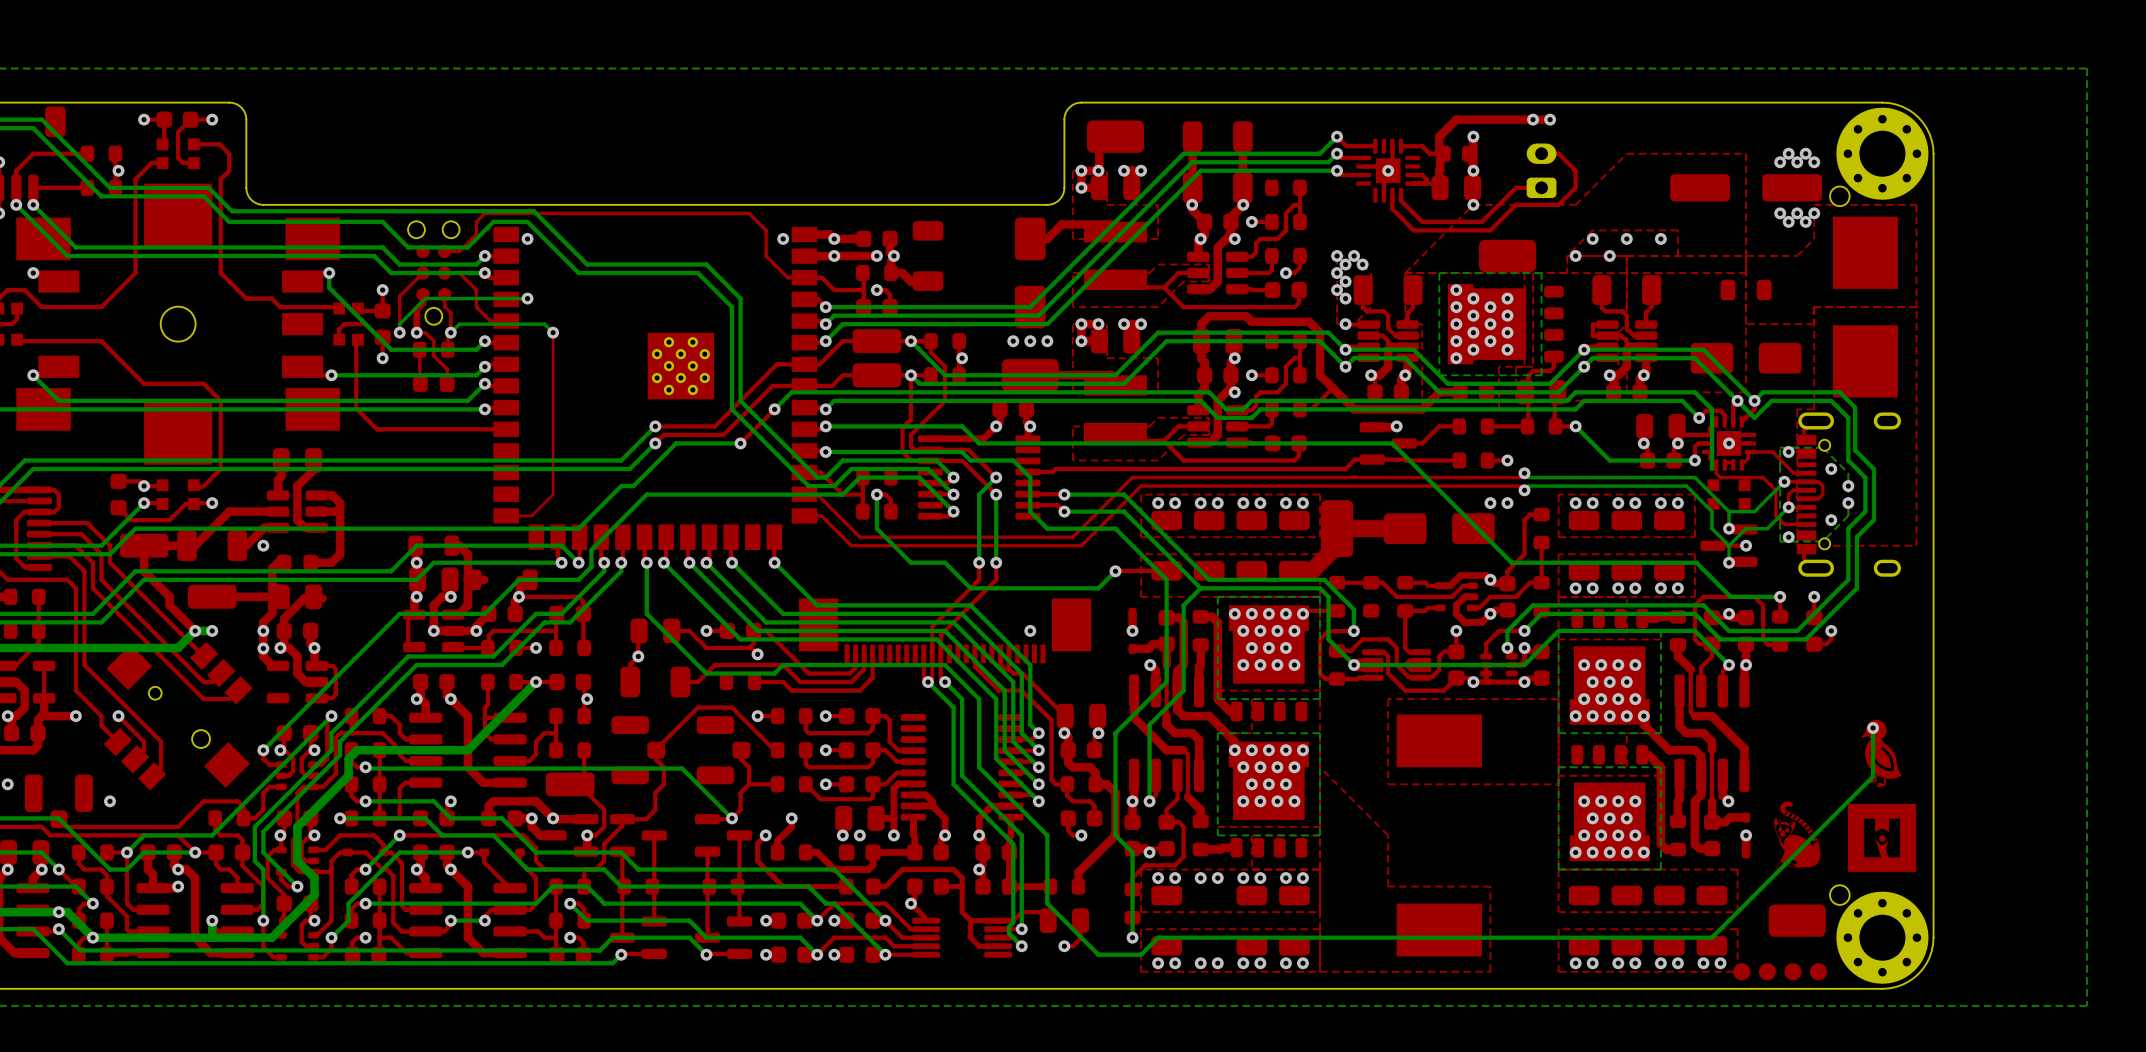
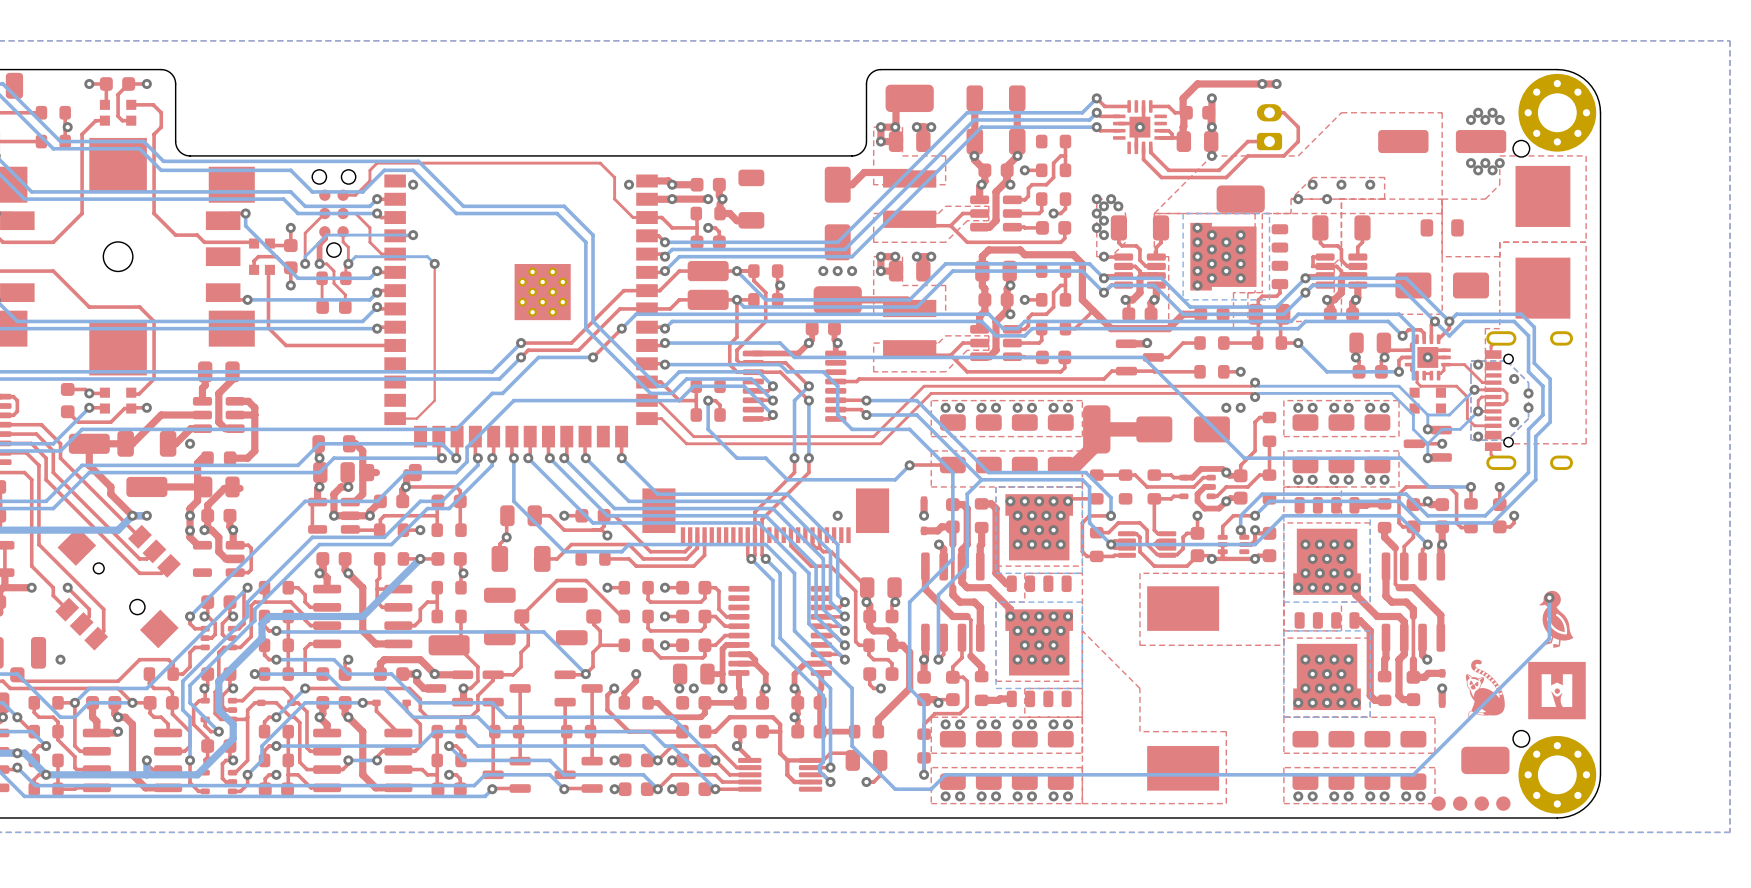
part: none -> (988, 760)

